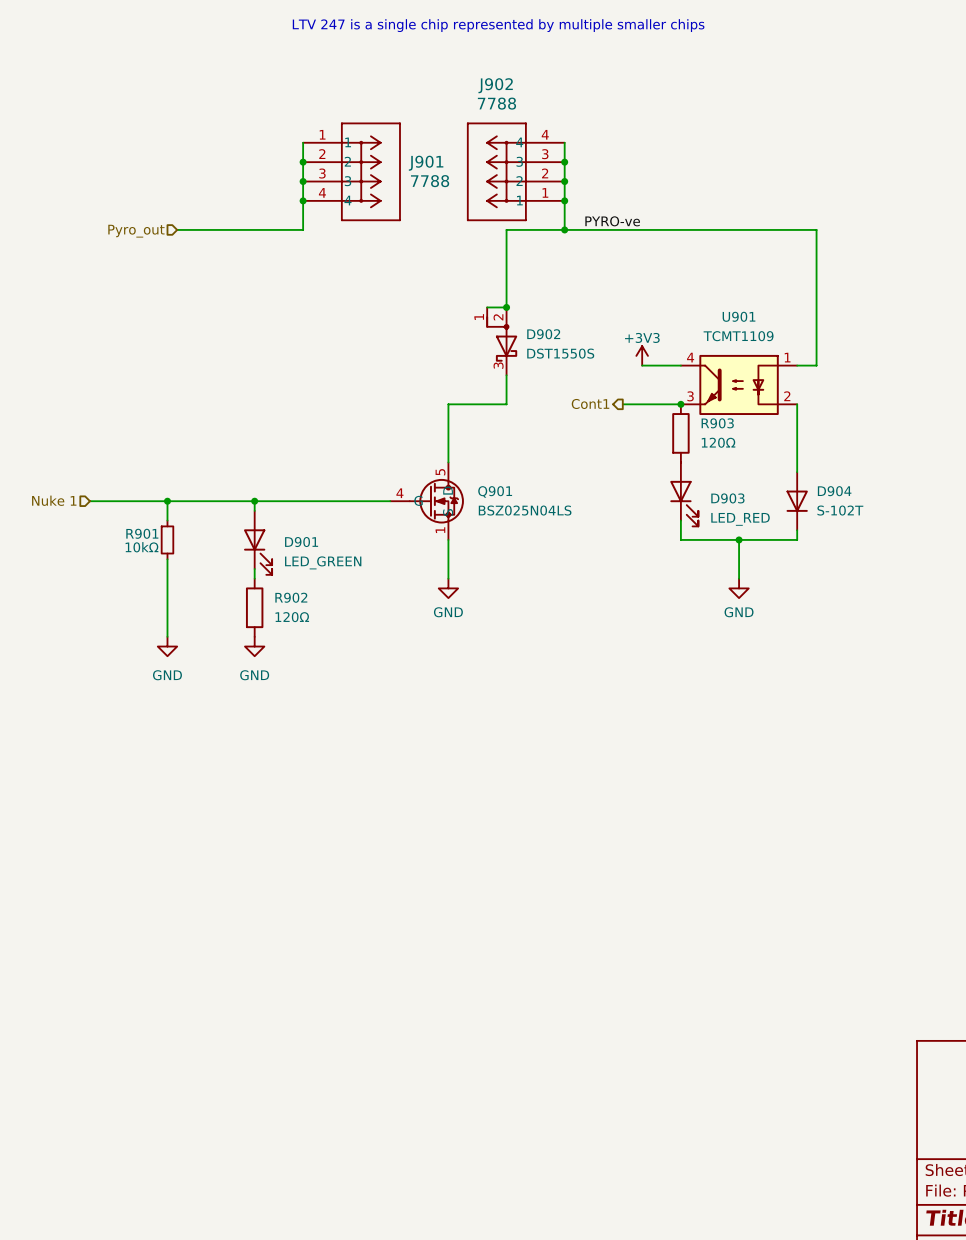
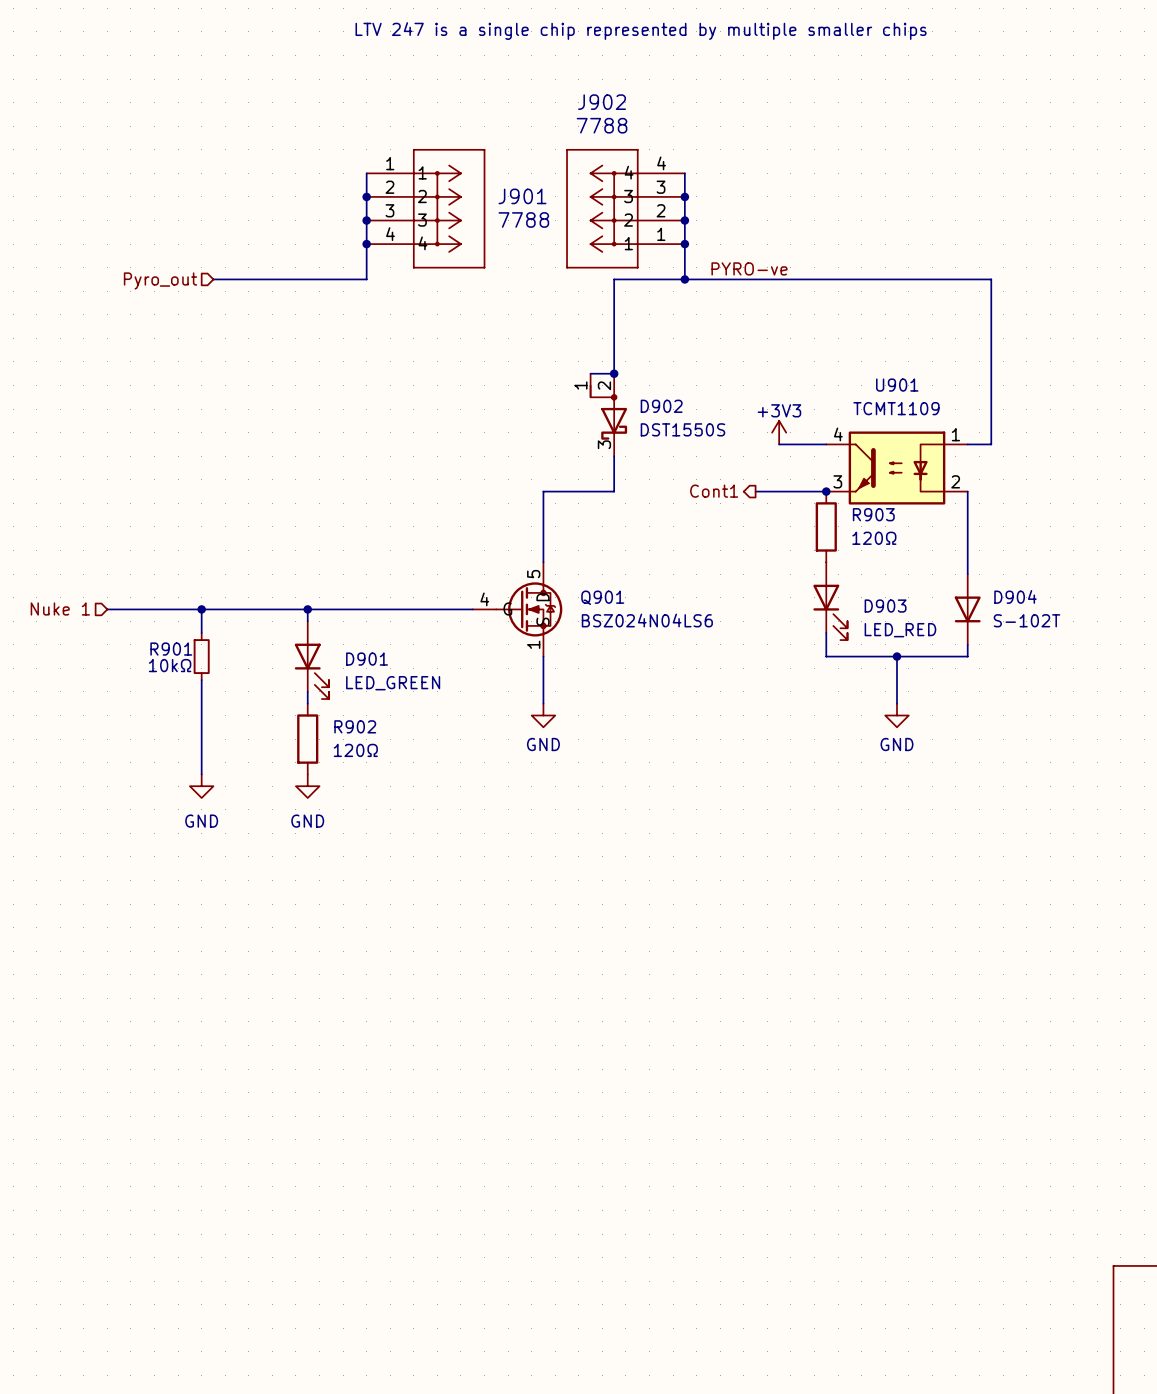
Q901 value: BSZ025N04LS (525, 510) -> BSZ024N04LS6 (647, 620)

